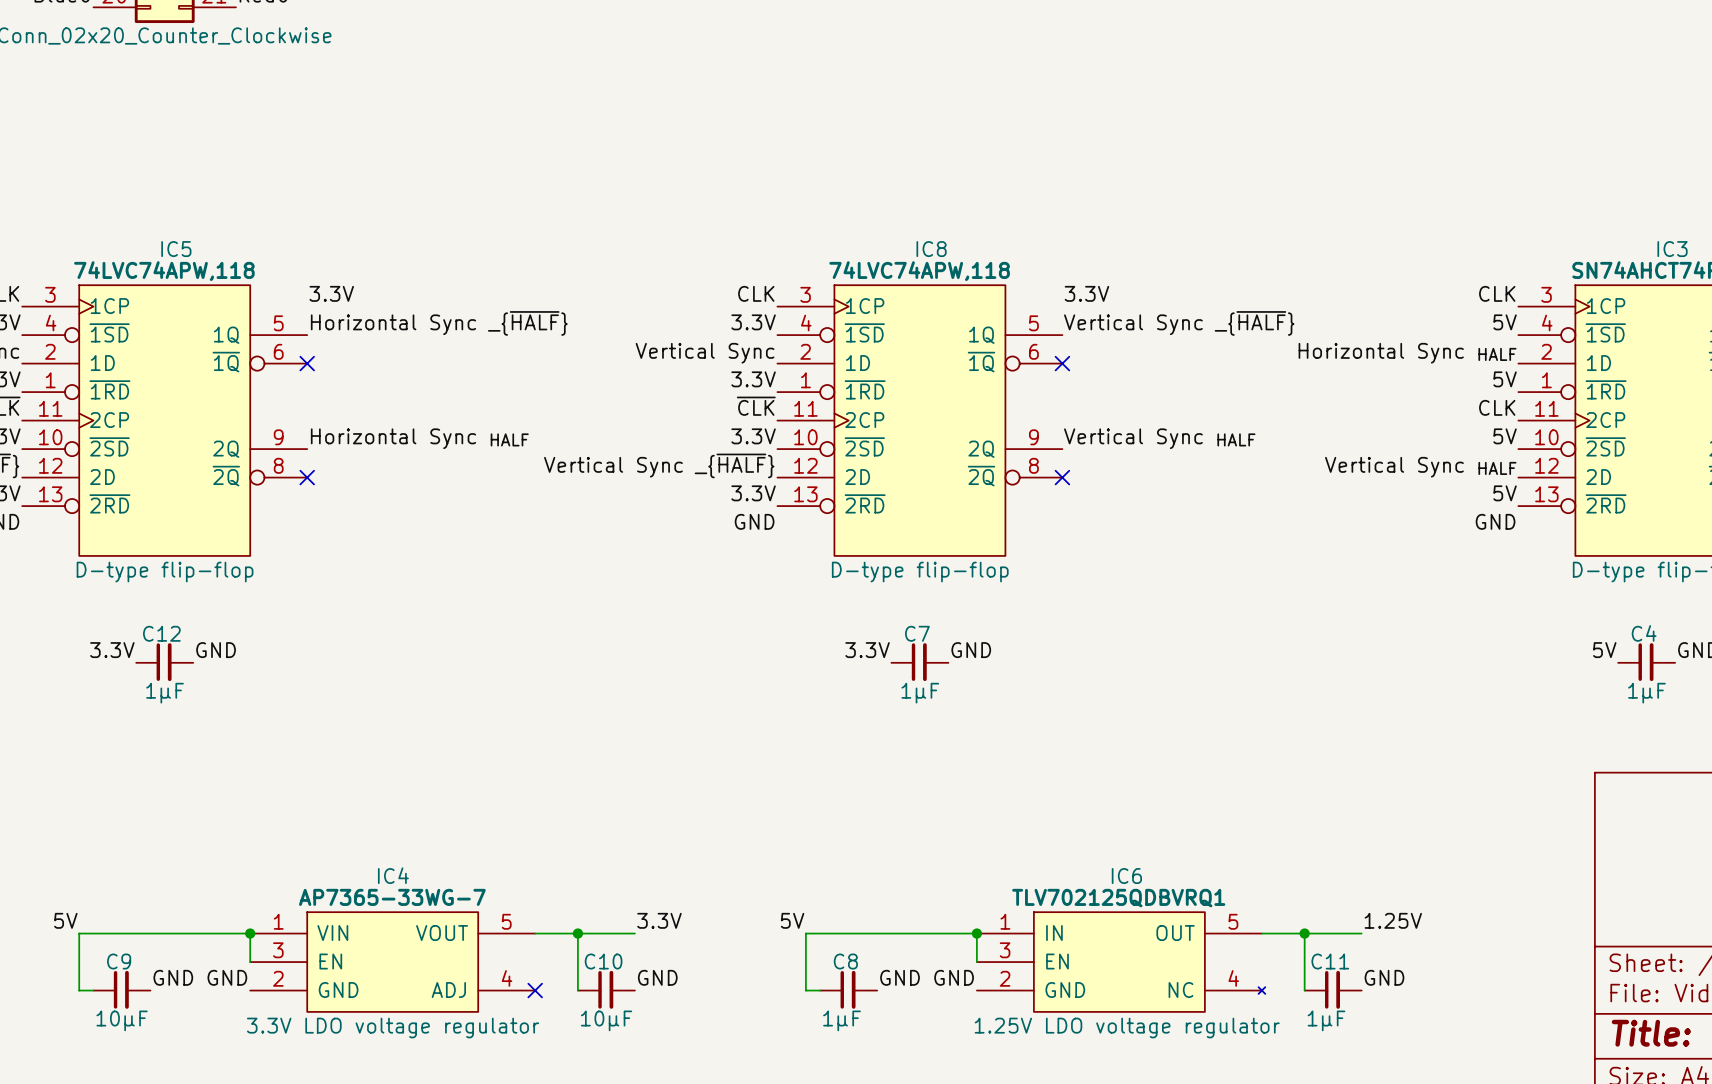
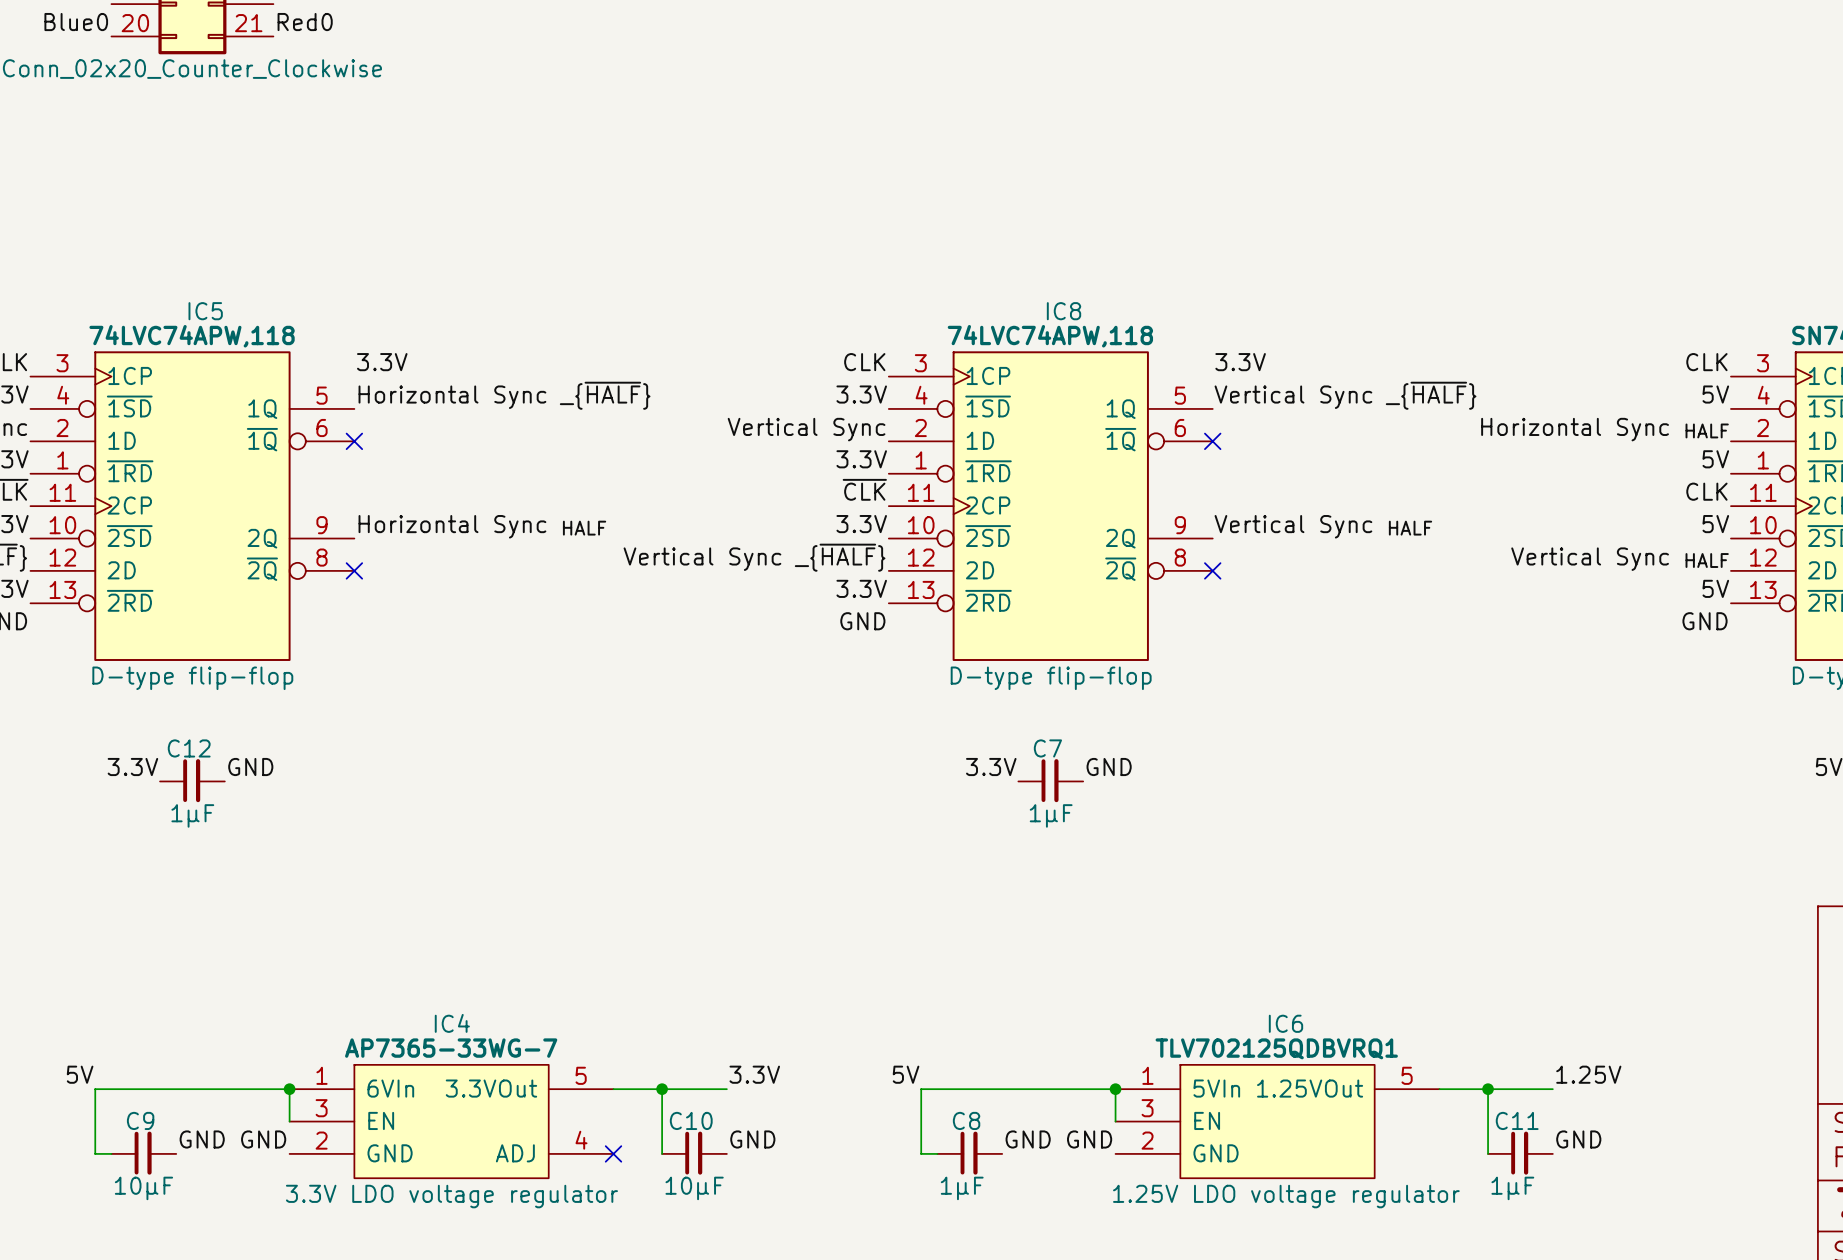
IC6 symbol: [976, 912, 1266, 1012] -> [1115, 1064, 1440, 1179]
IC4 pin name: VIN (332, 933) -> 6VIn (390, 1088)
IC4 pin name: VOUT (442, 933) -> 3.3VOut (491, 1088)

